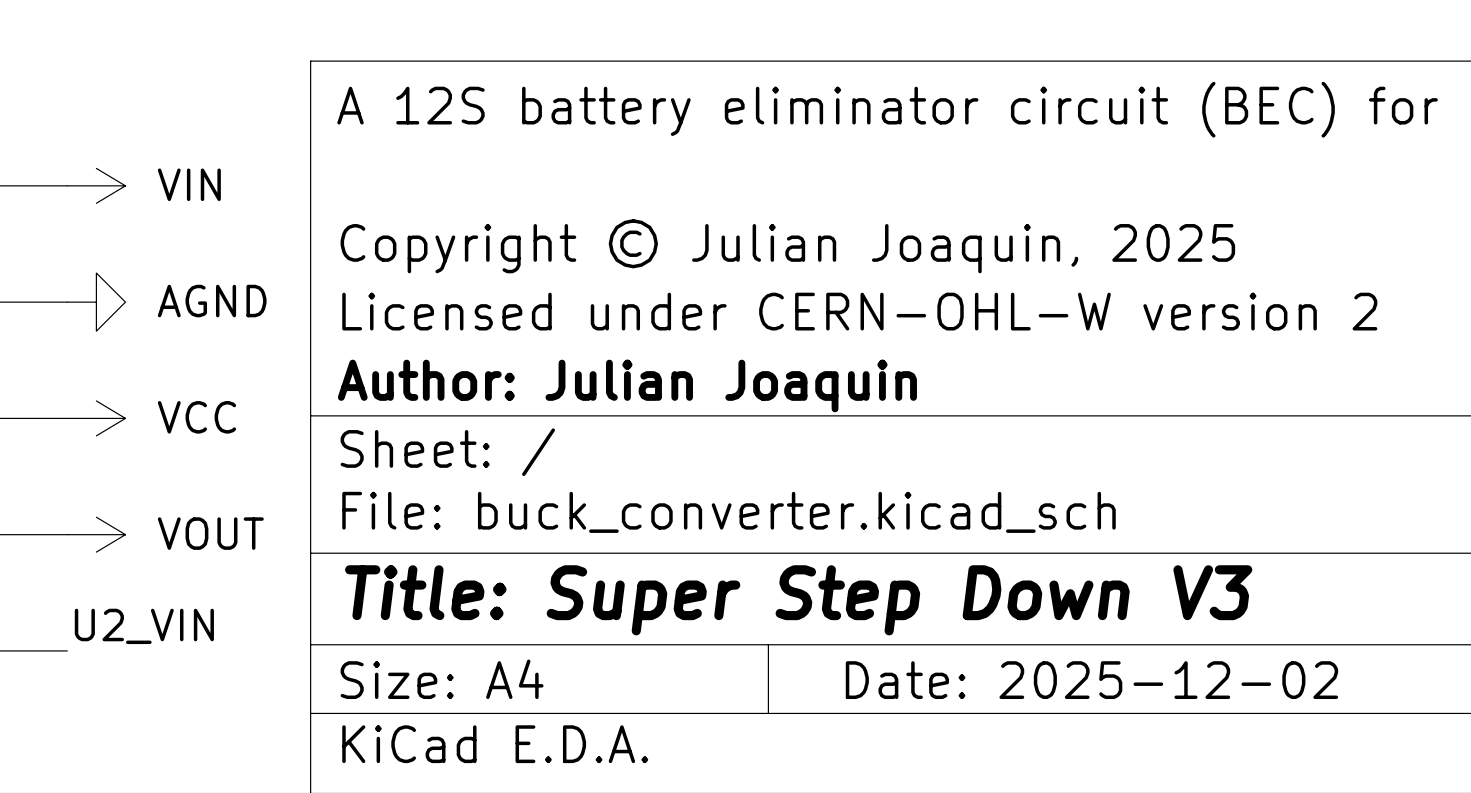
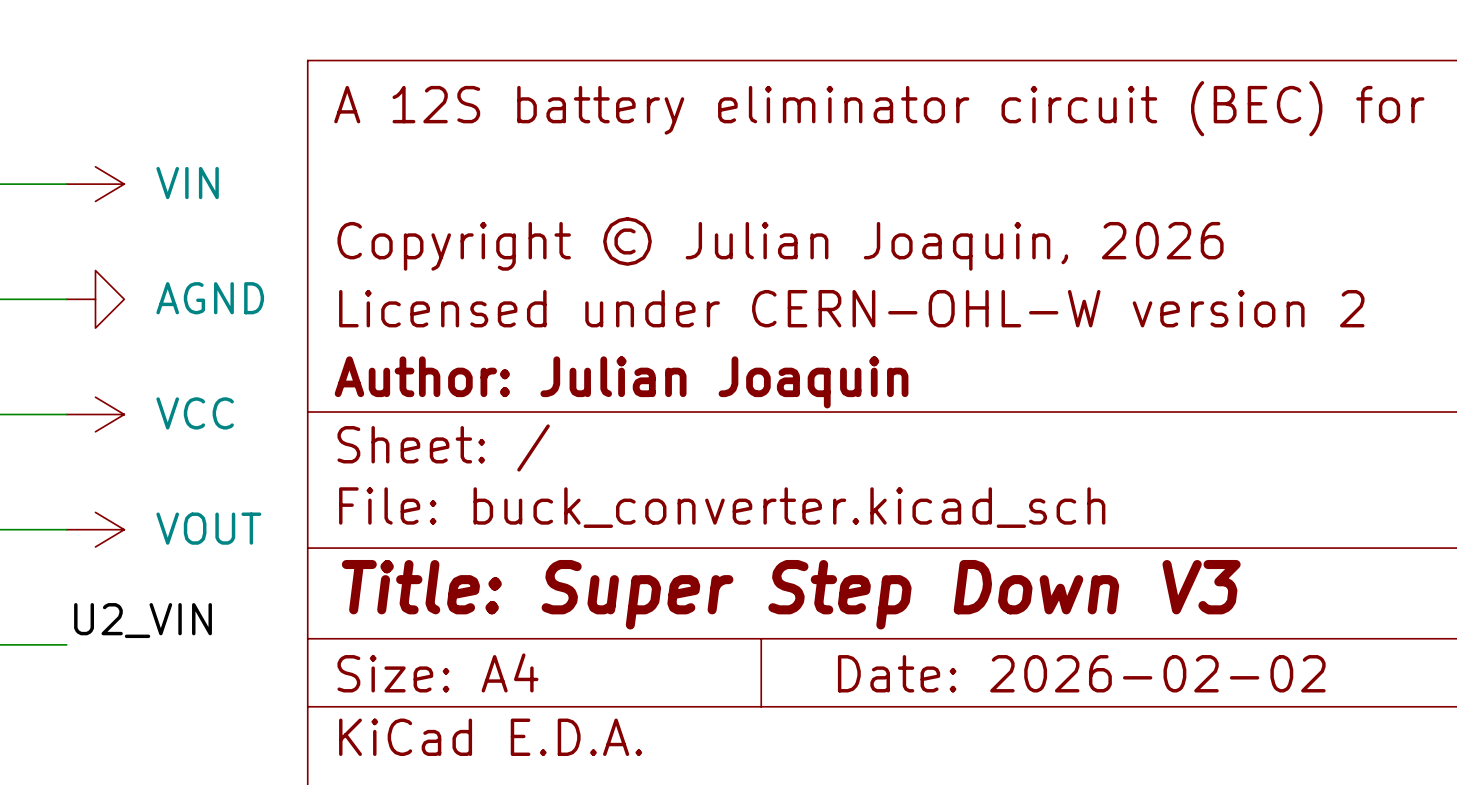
title block: Copyright © Julian Joaquin, 2025 (787, 246) -> Copyright © Julian Joaquin, 2026 (780, 243)
title block: Date: 2025-12-02 (1091, 680) -> Date: 2026-02-02 (1081, 673)

